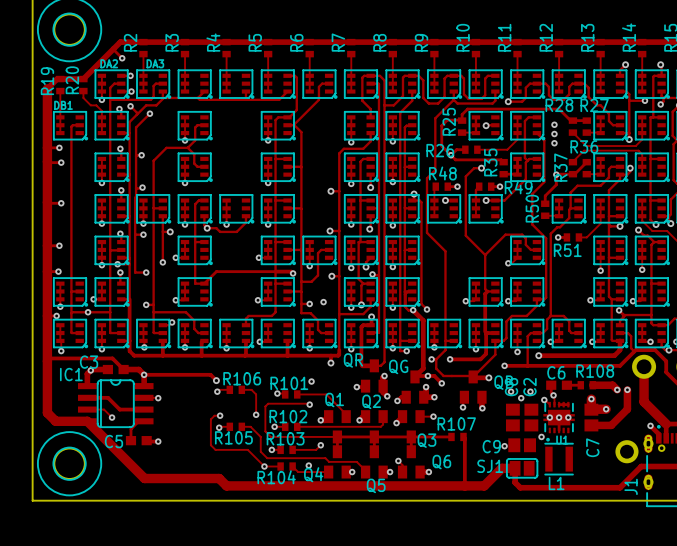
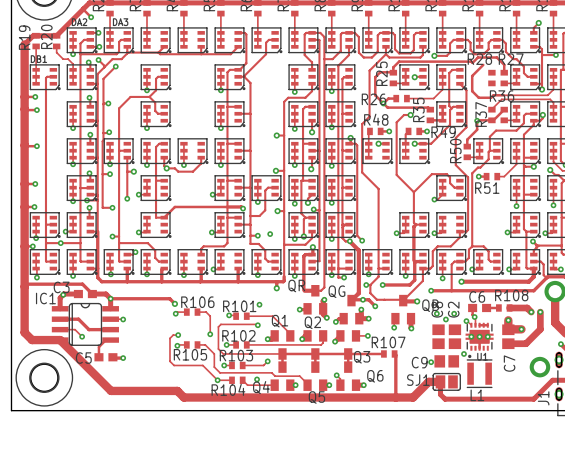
track: (467, 109) (559, 109) (570, 120) (586, 120) -> (398, 62) (472, 62) (477, 57) (496, 57) (504, 64) (504, 72)
via: (554, 124) -> none
track: (572, 132) (586, 146) -> (483, 64) (472, 75) (472, 91) (478, 97) (503, 95)
via: (554, 134) -> none
via: (554, 143) -> none

